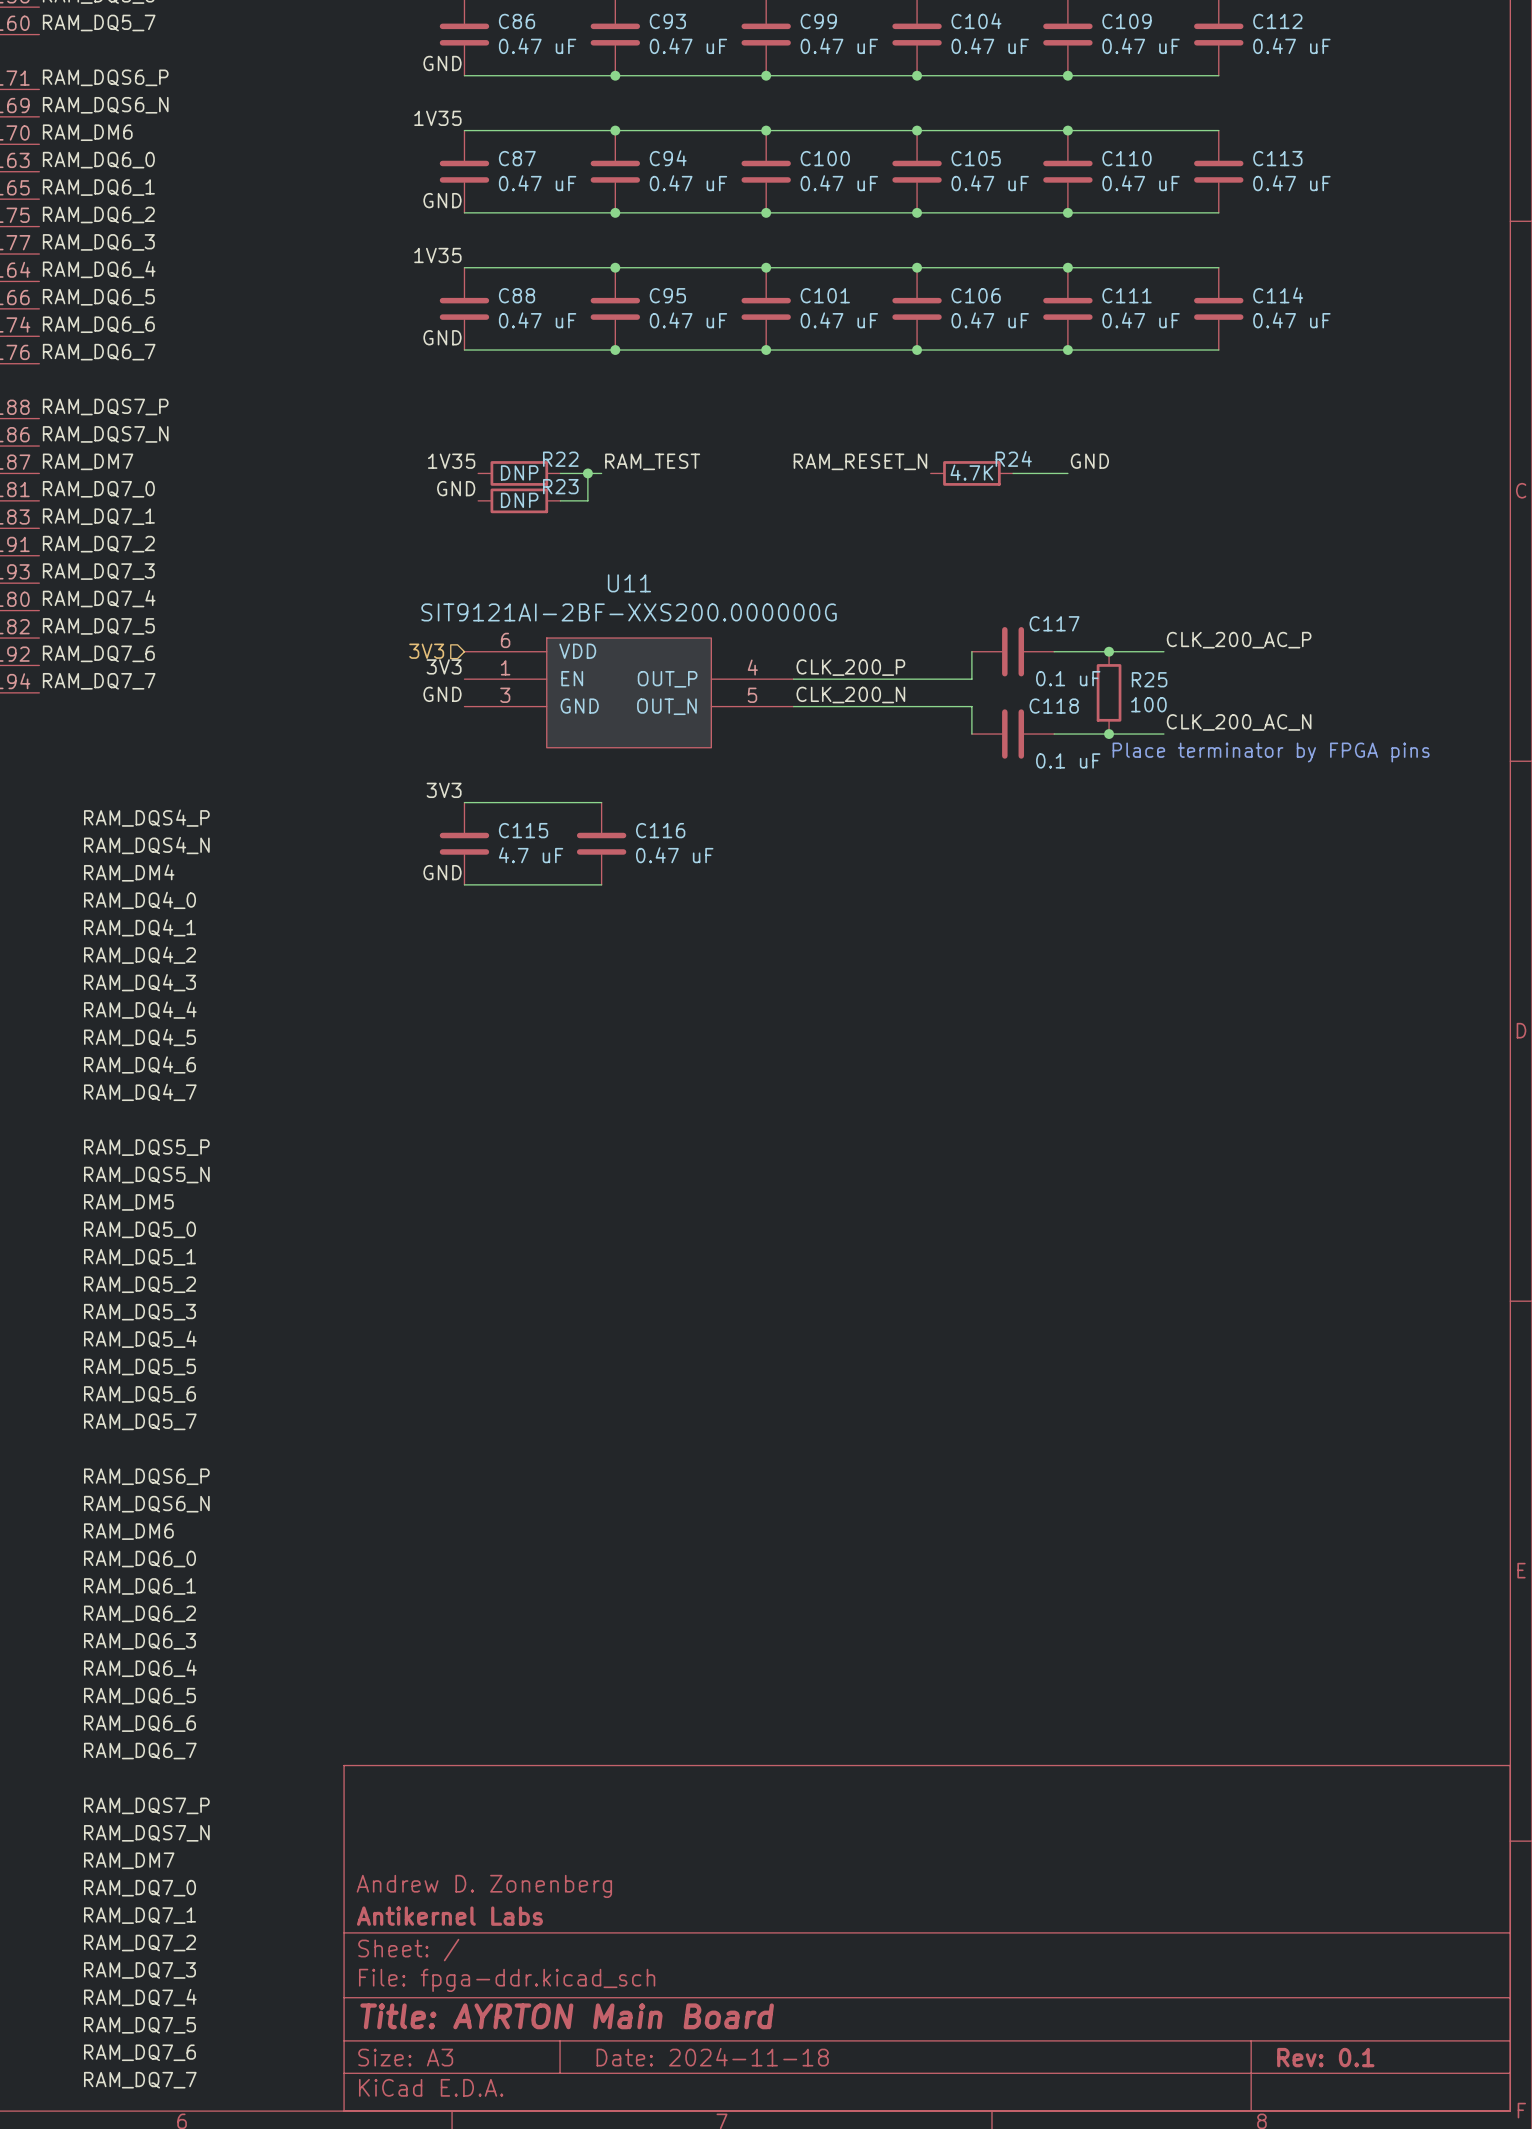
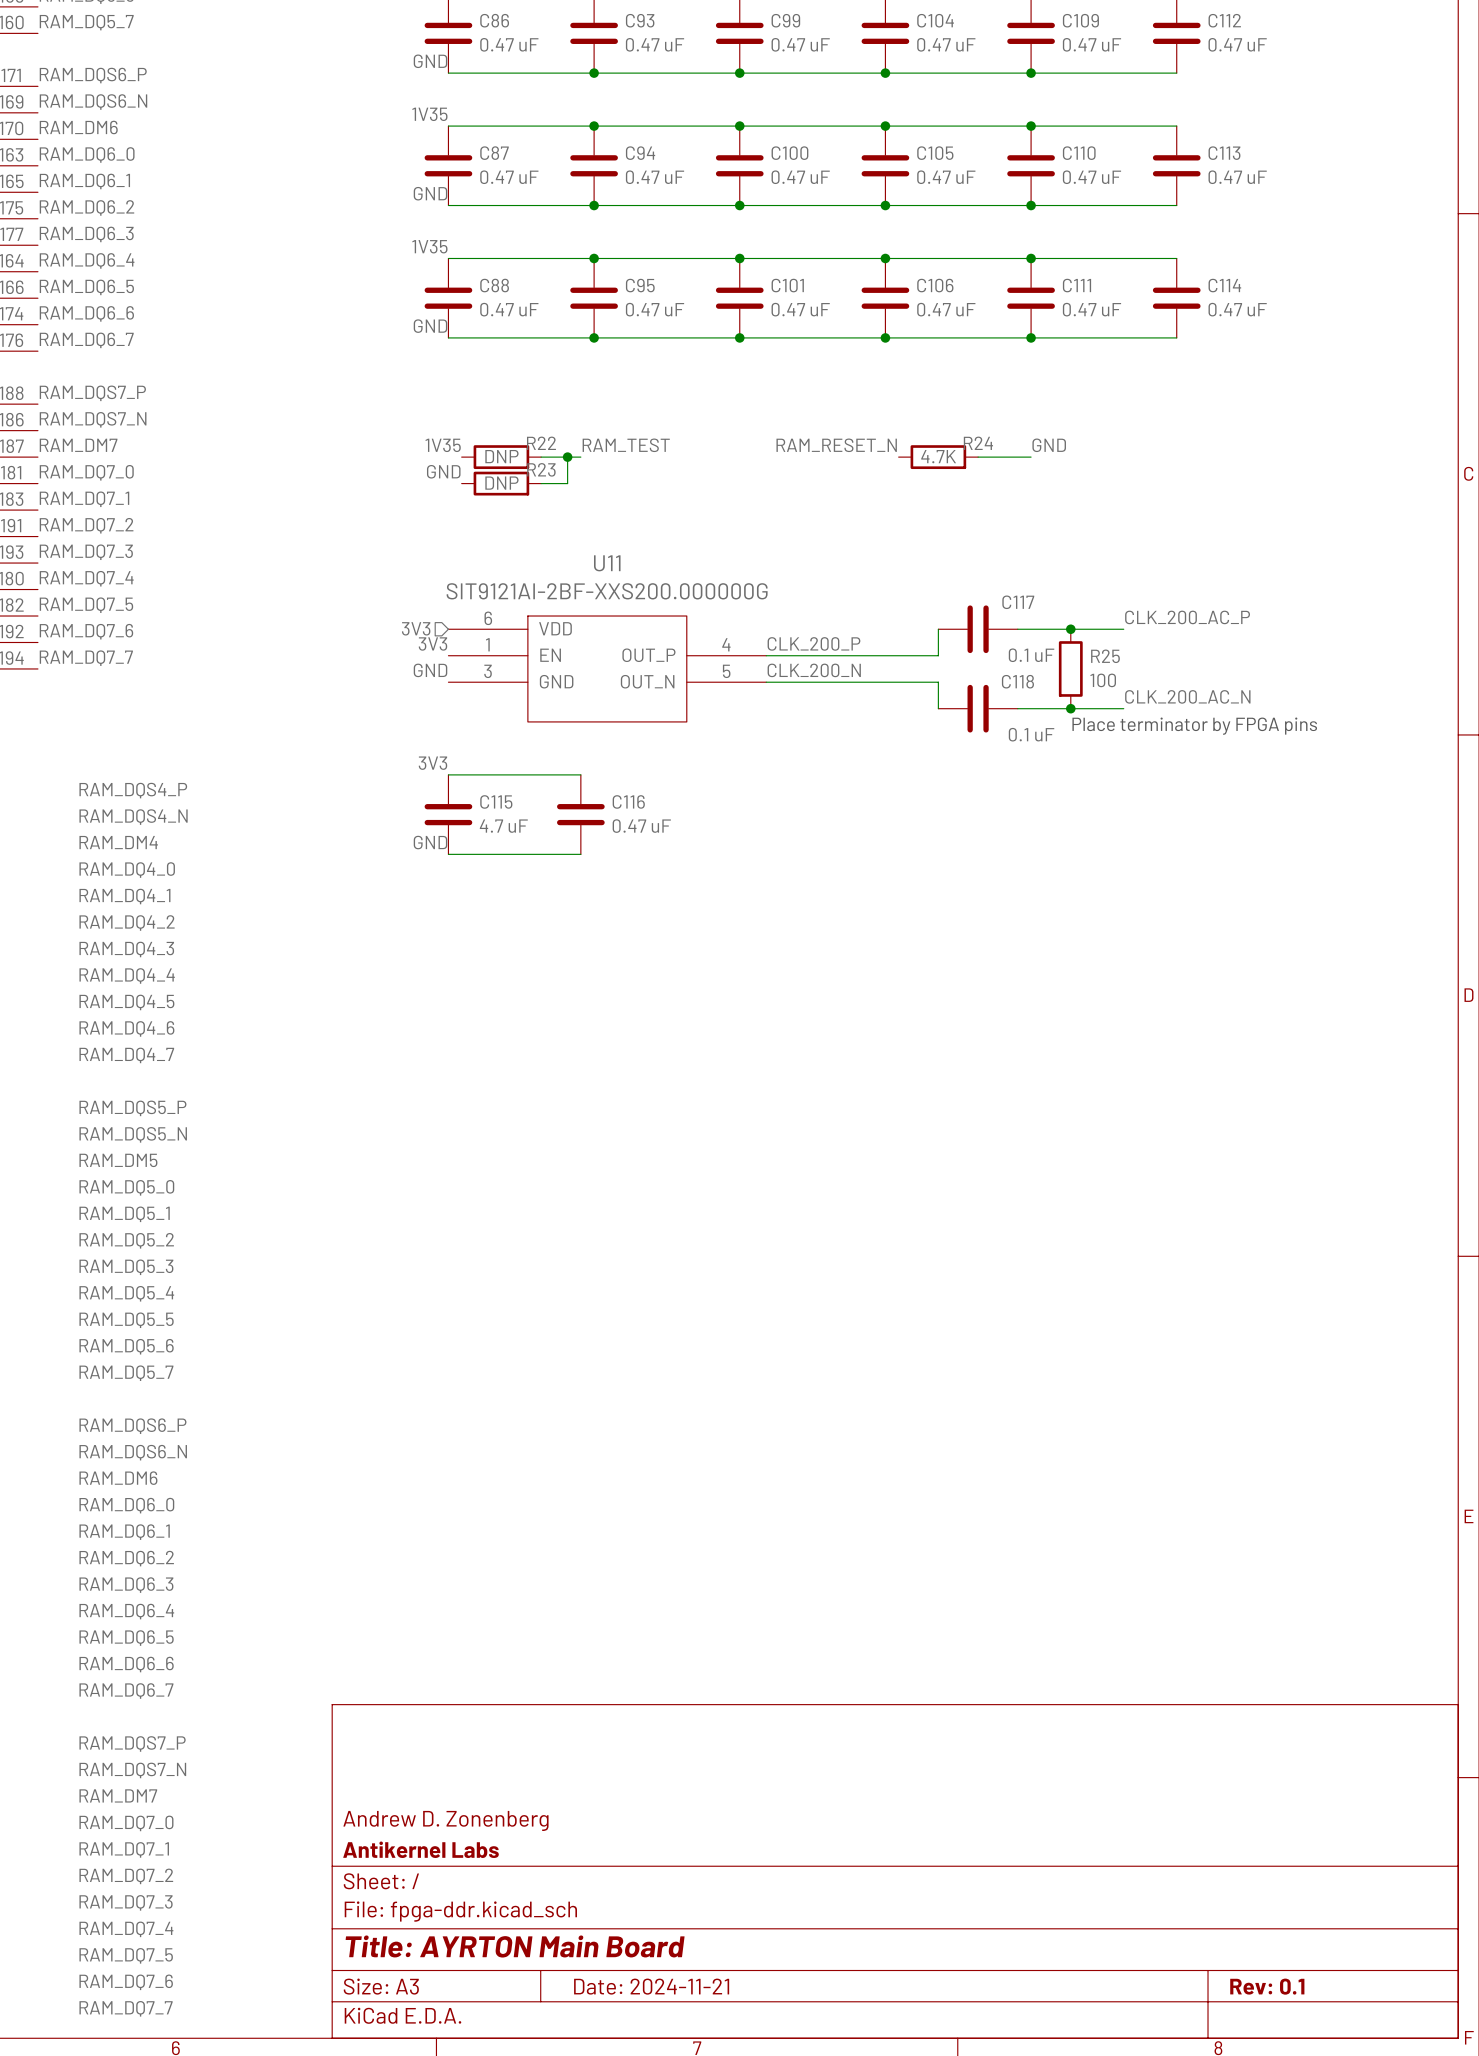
title block: Date: 2024-11-18 (712, 2057) -> Date: 2024-11-21 (651, 1986)

